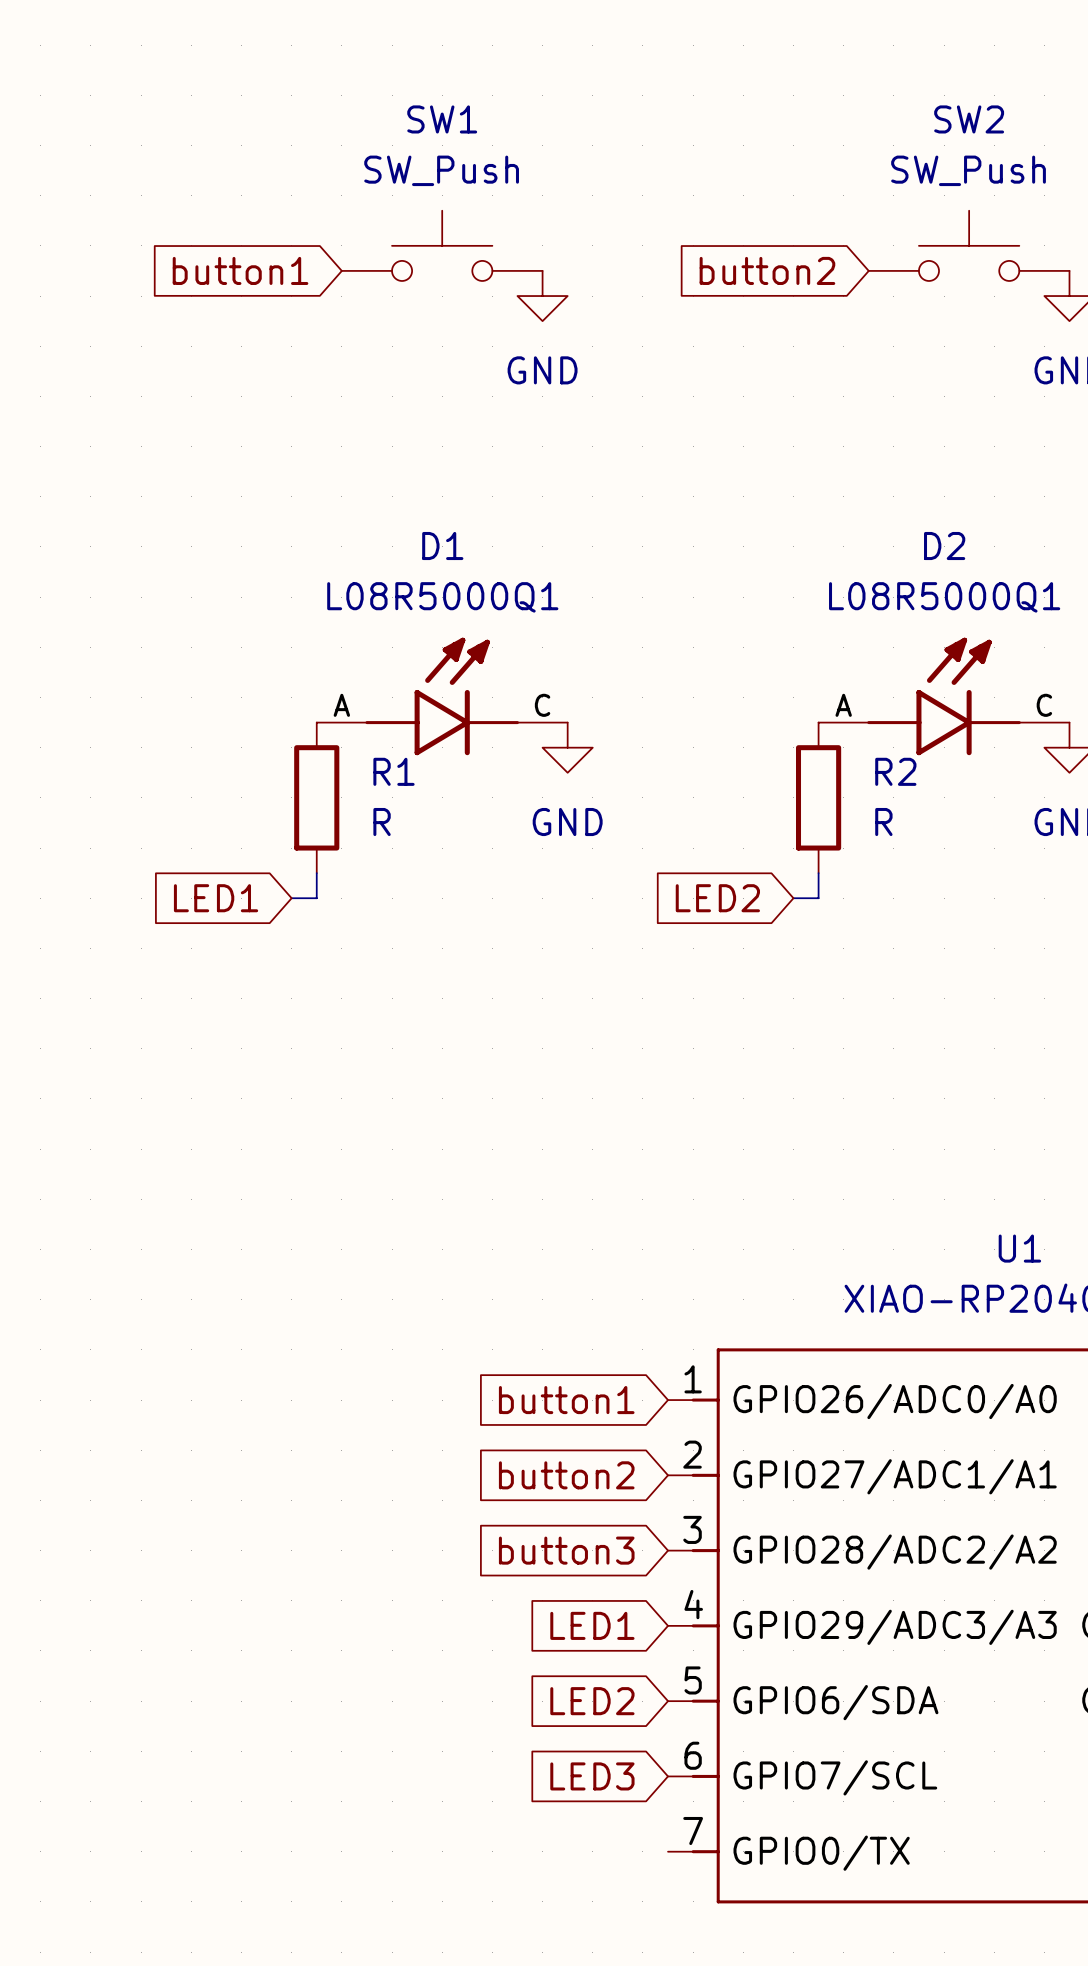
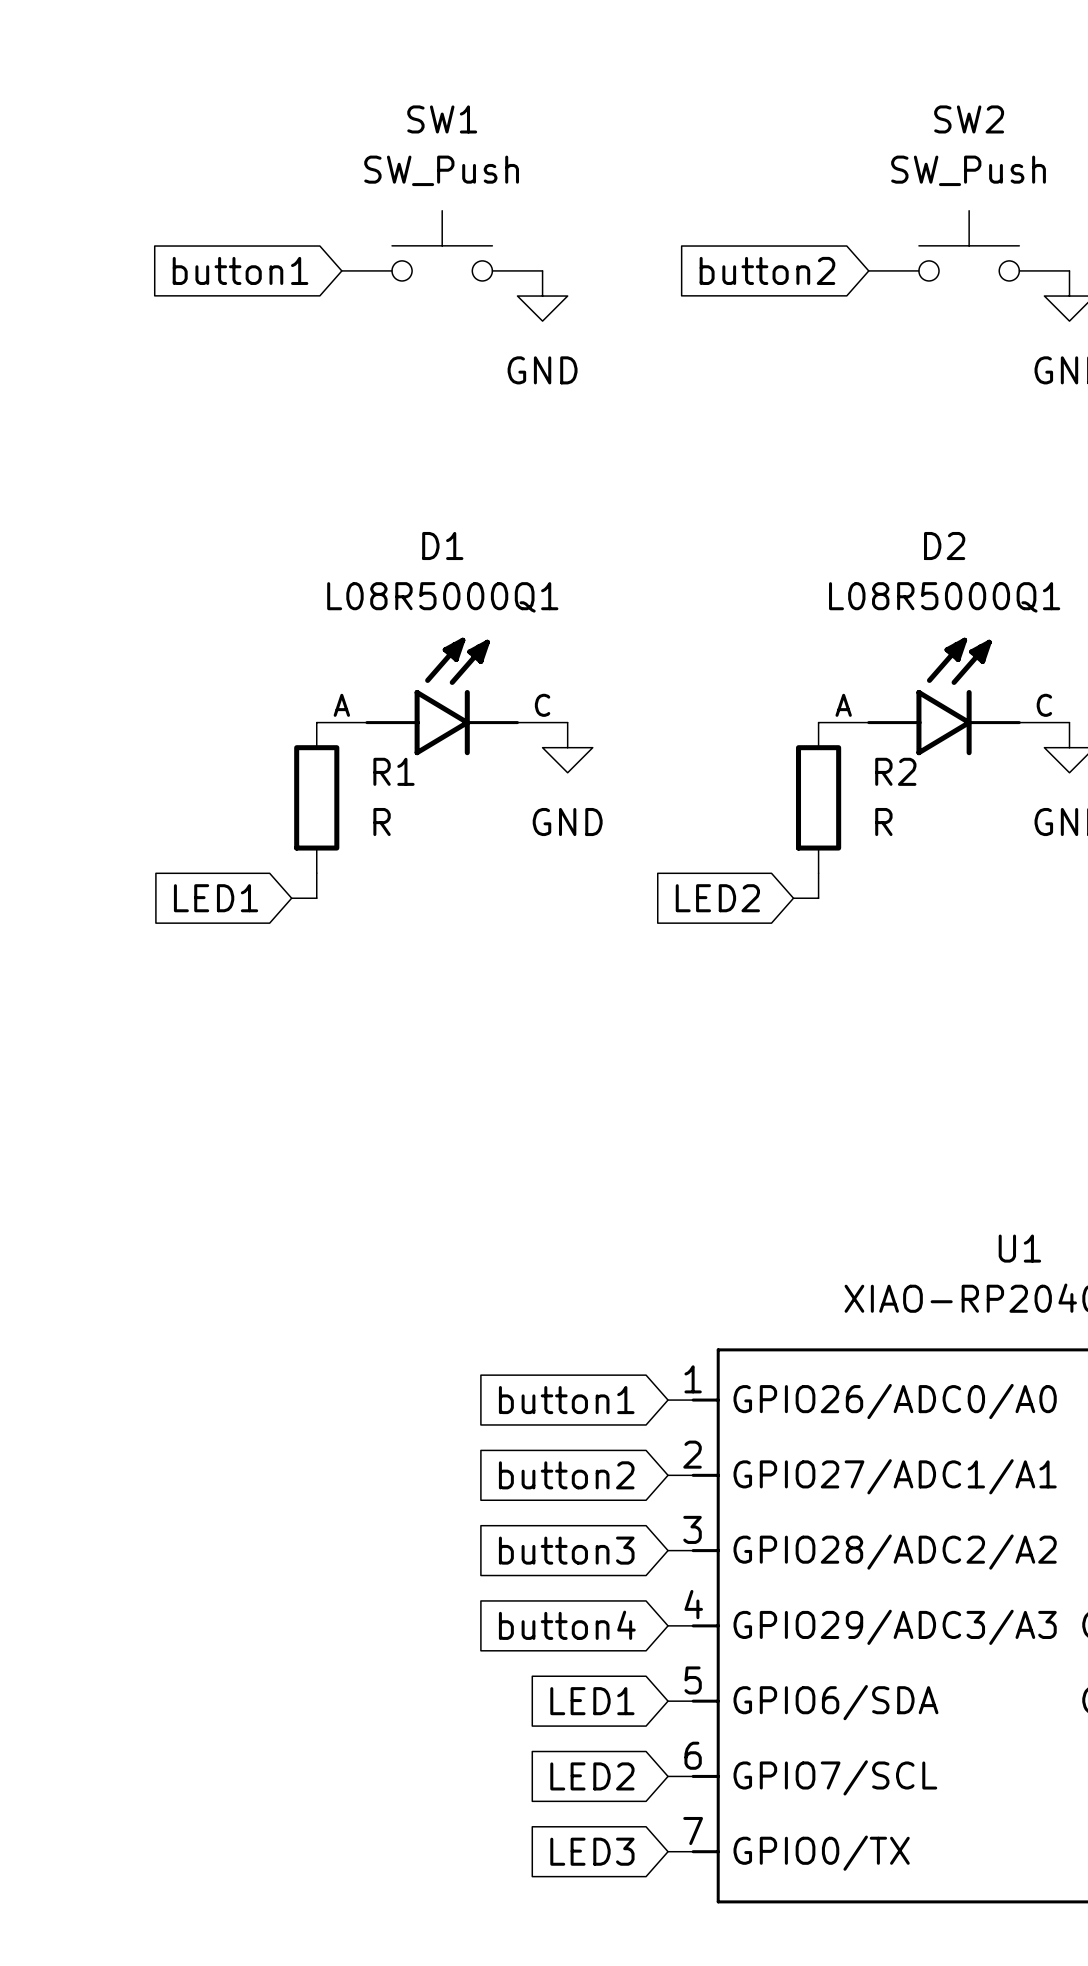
global label: LED1 (592, 1625) -> button4 (567, 1625)
global label: LED2 (592, 1701) -> LED1 (592, 1701)
global label: LED3 (592, 1776) -> LED2 (592, 1776)
global label: none -> LED3 (592, 1851)

